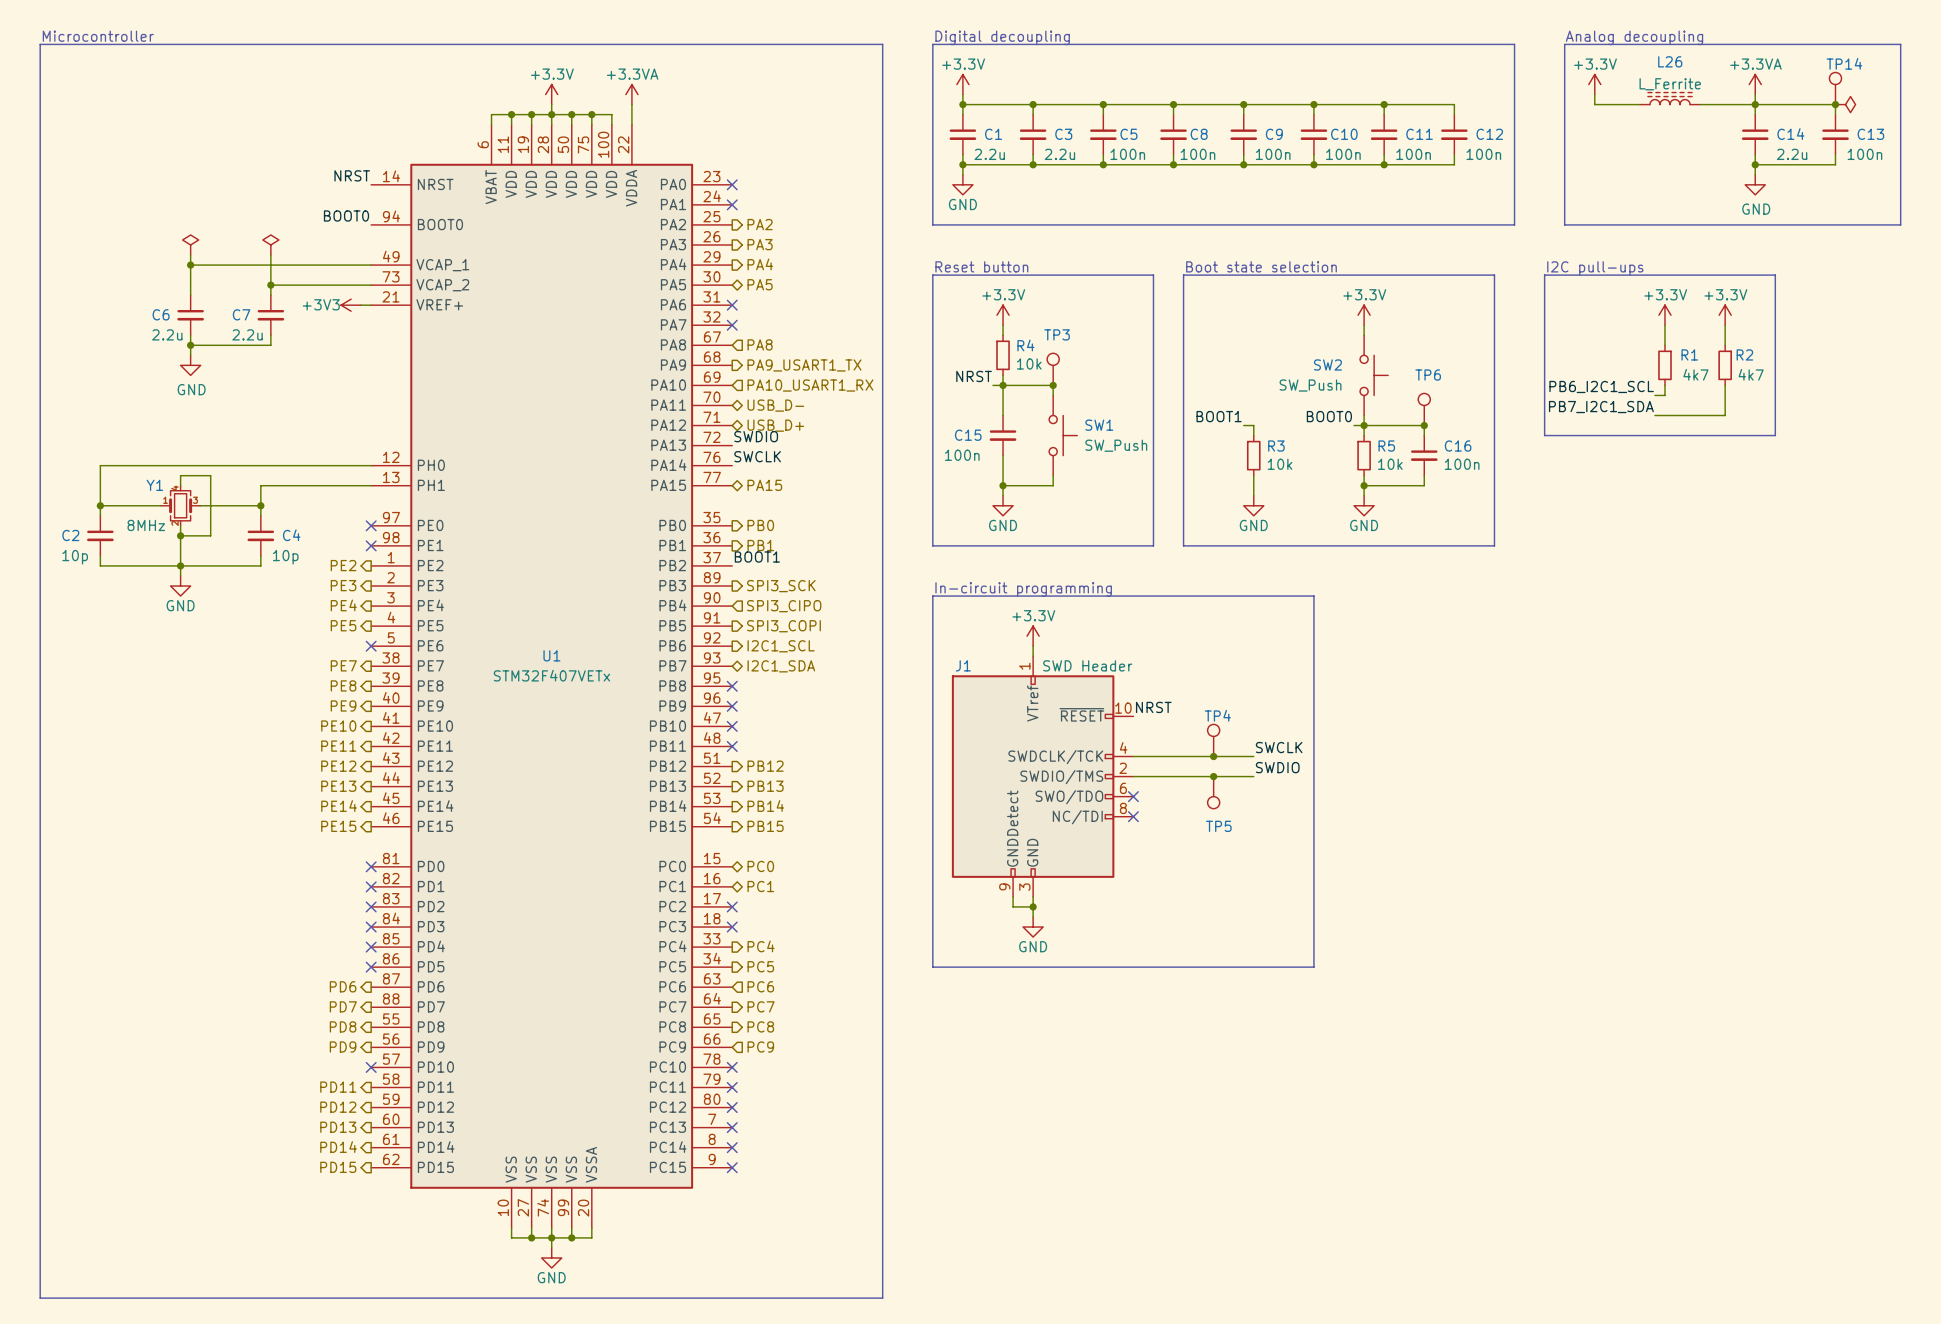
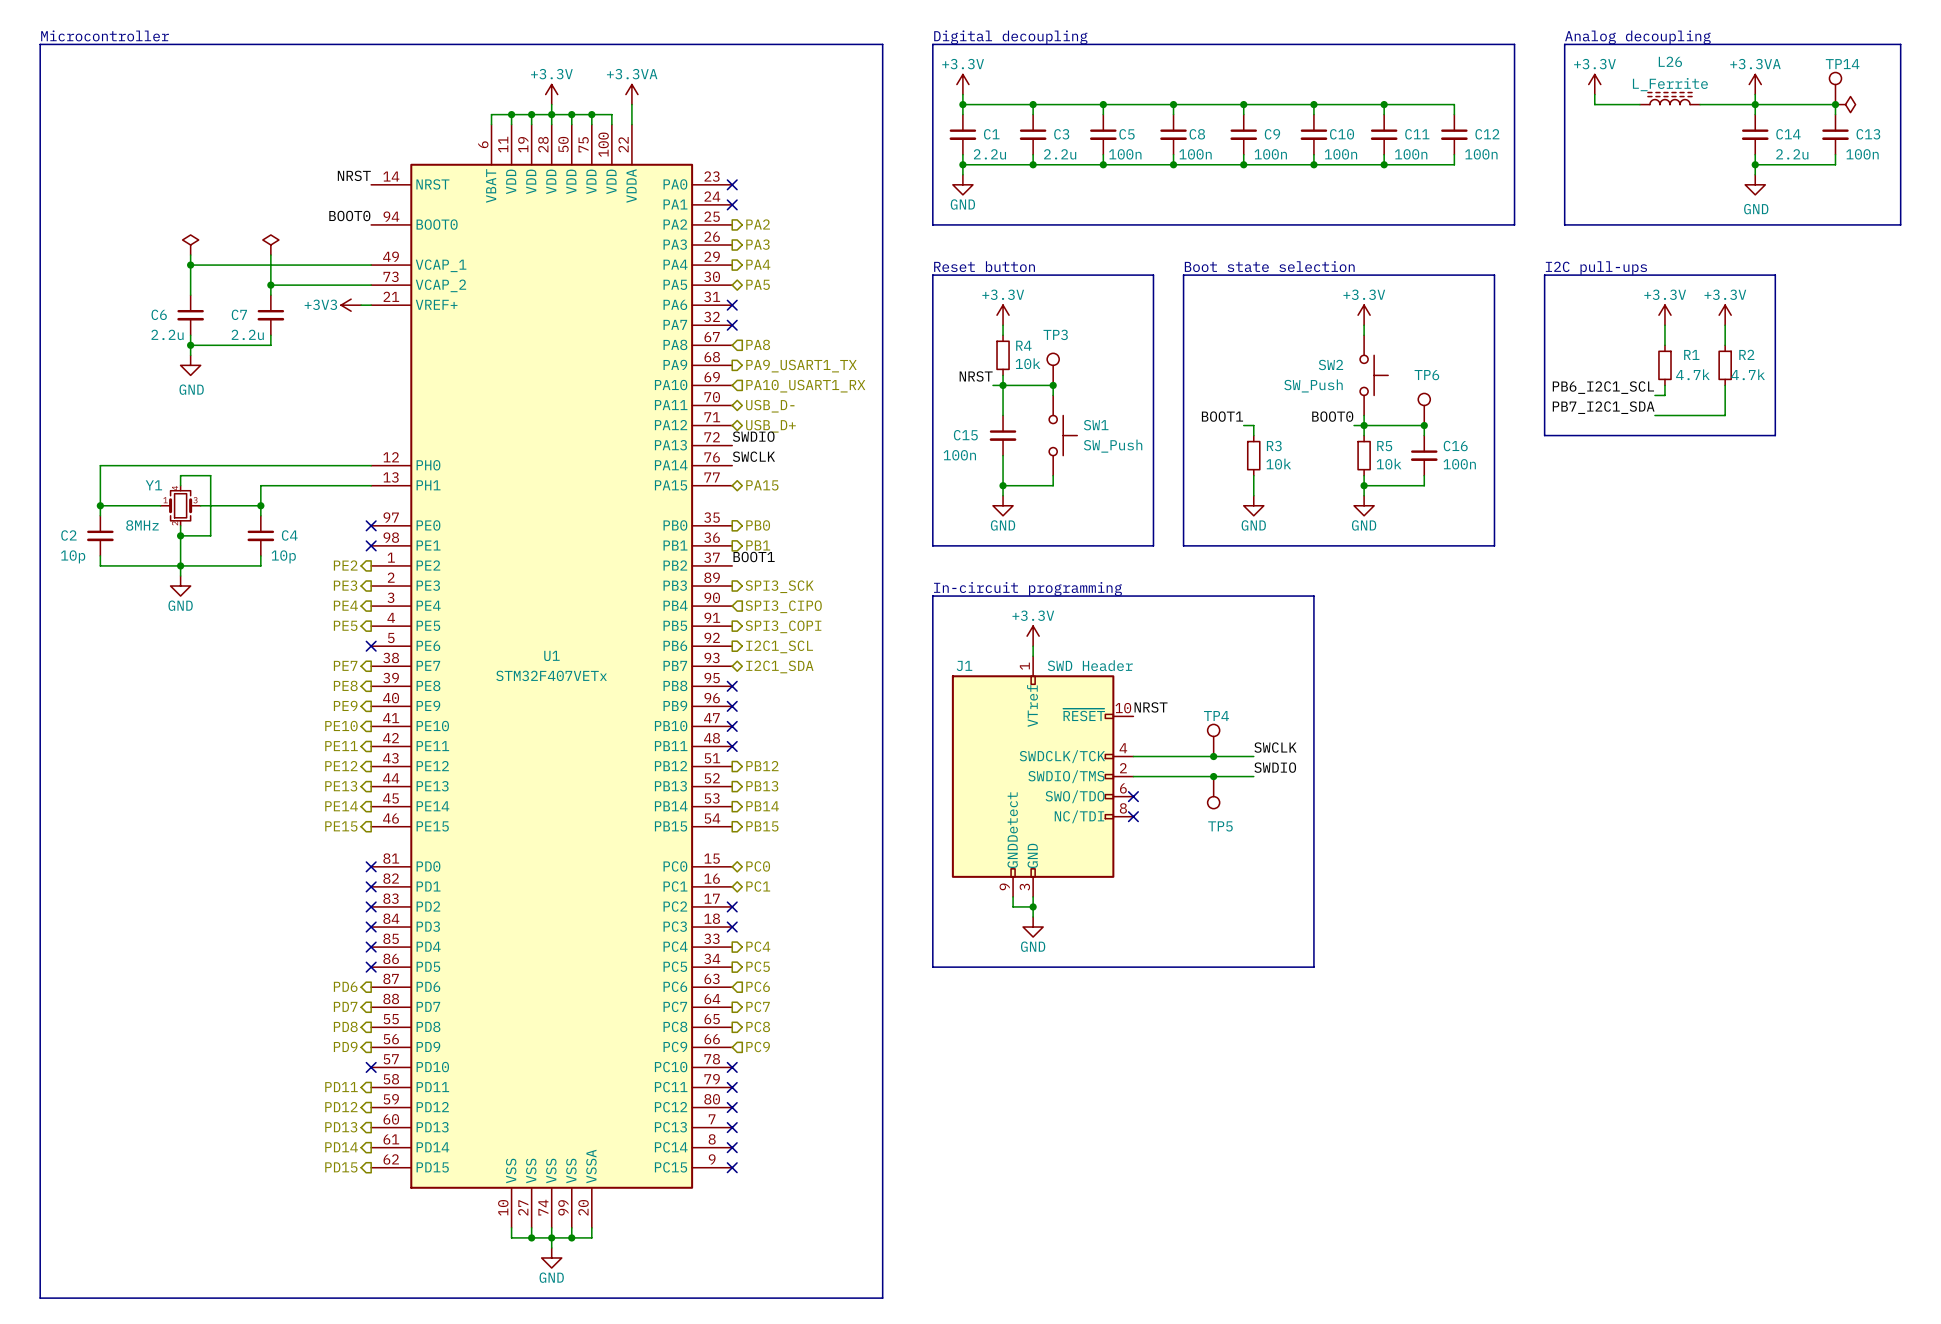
R1 value: 4k7 (1695, 374) -> 4.7k (1692, 374)
R2 value: 4k7 (1751, 374) -> 4.7k (1748, 374)

